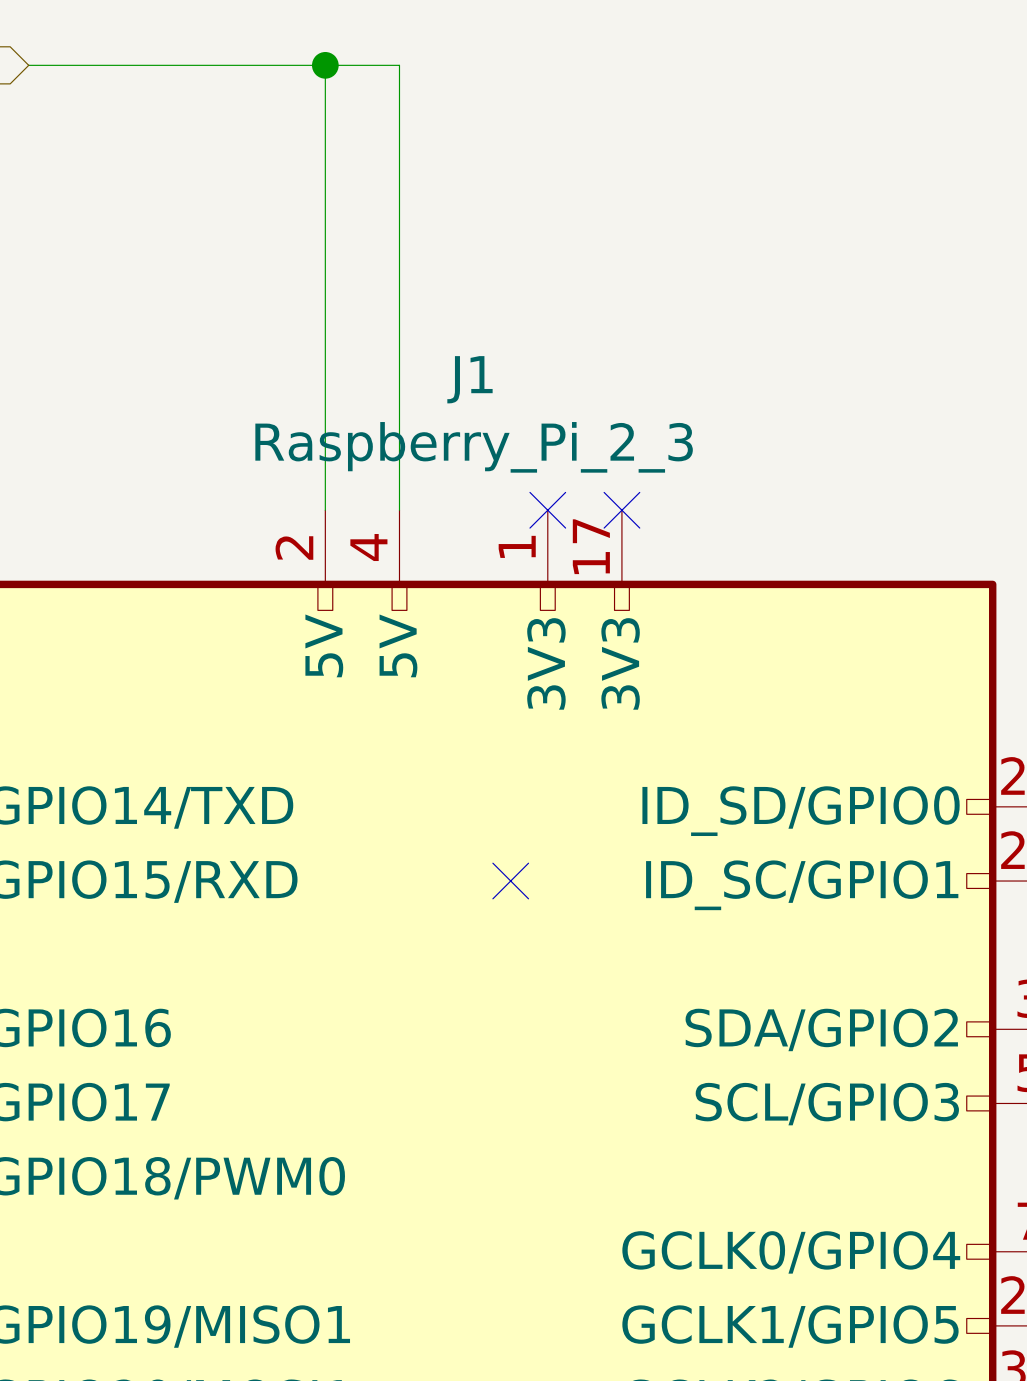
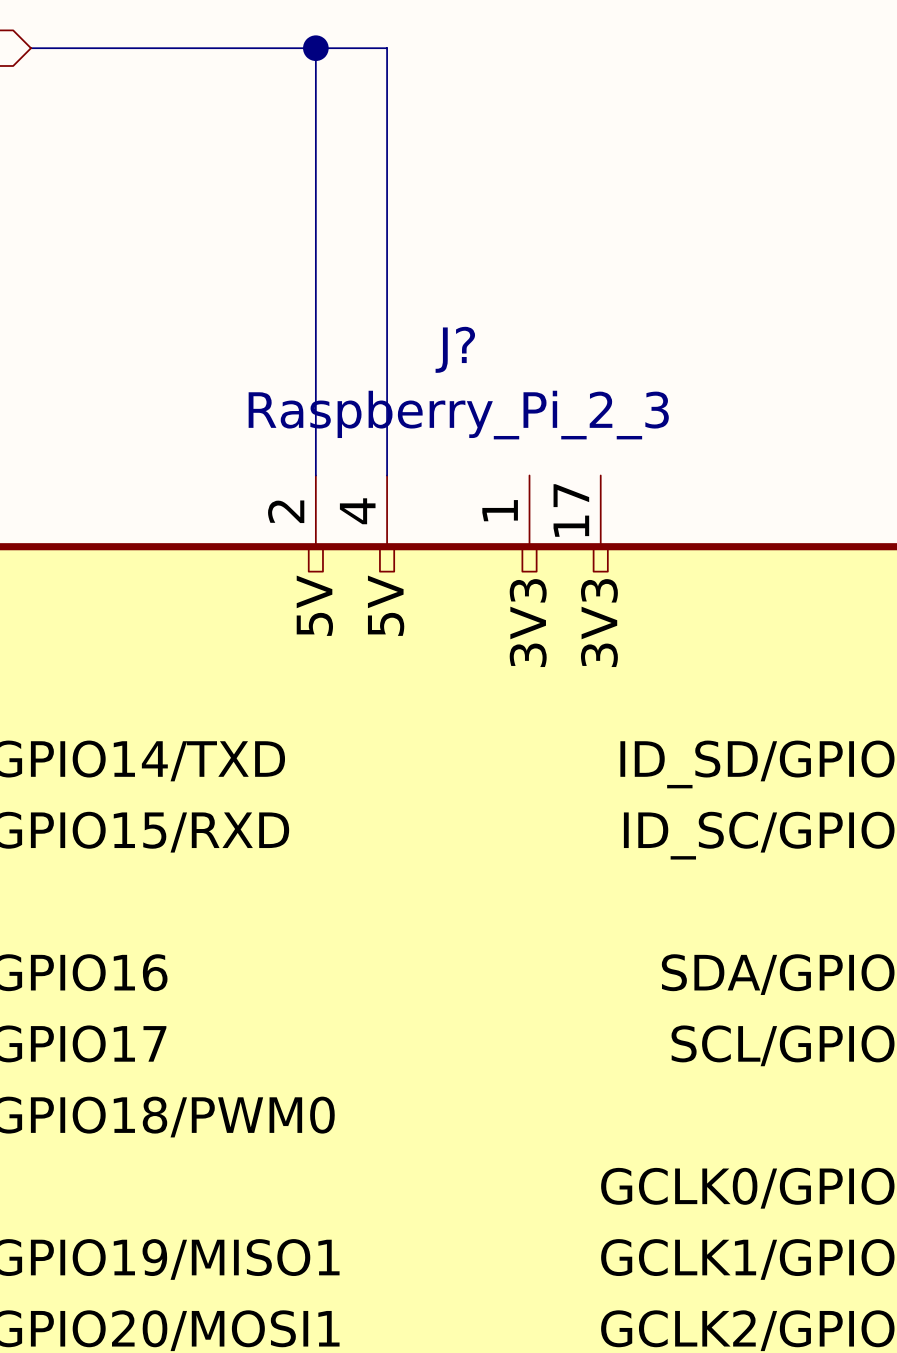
J1 name: J1 (469, 379) -> J? (455, 349)
no-connect mark: (547, 510) -> none
no-connect mark: (621, 510) -> none
no-connect mark: (510, 881) -> none

